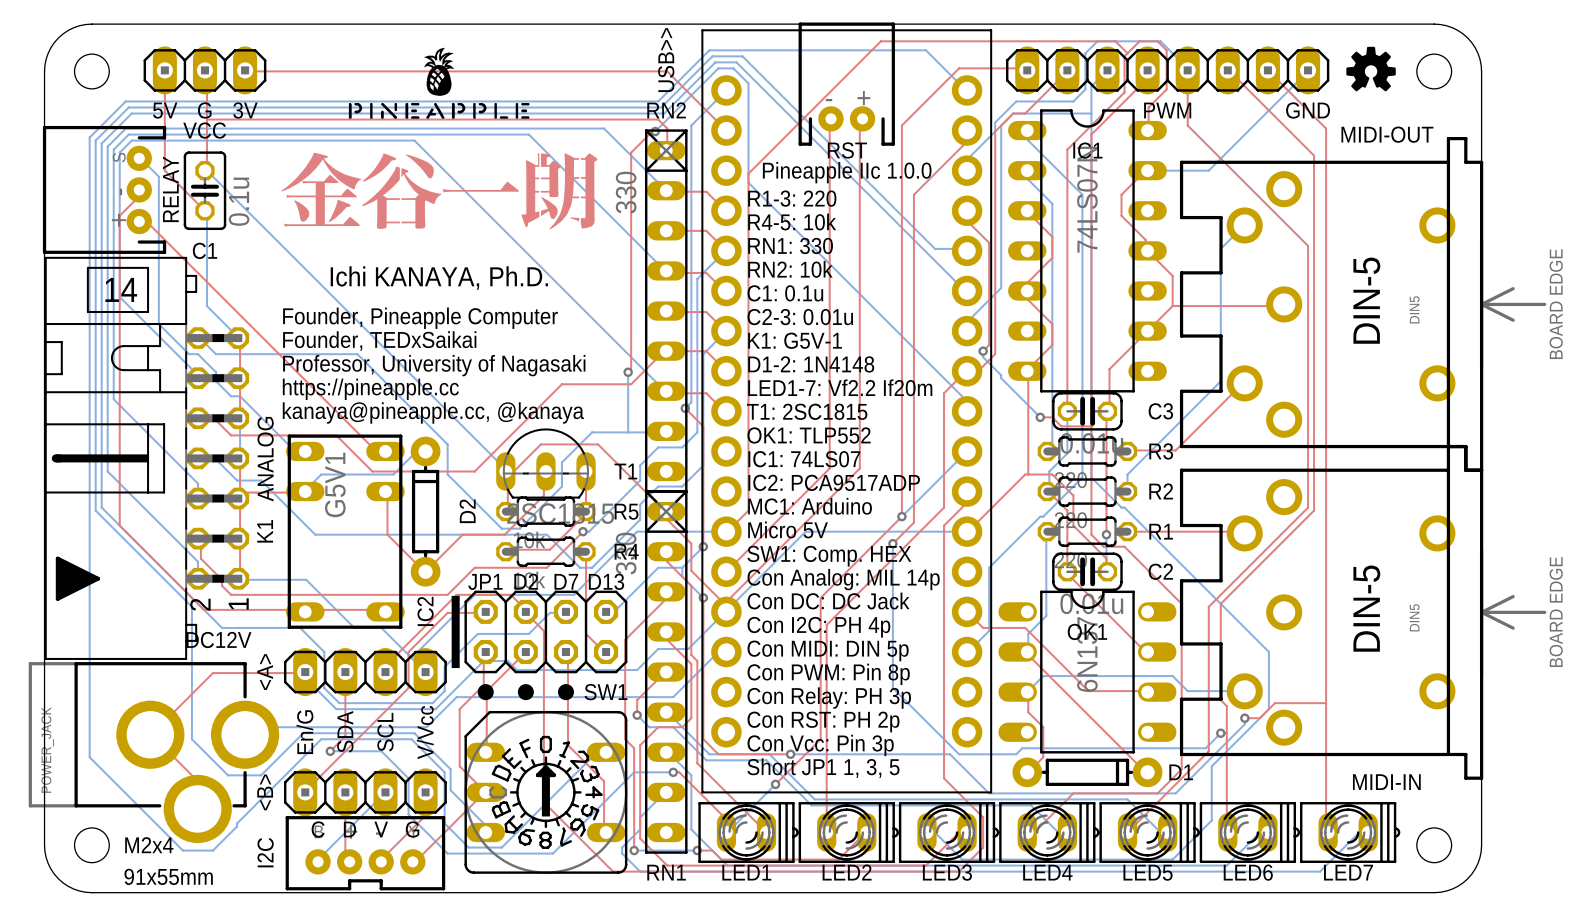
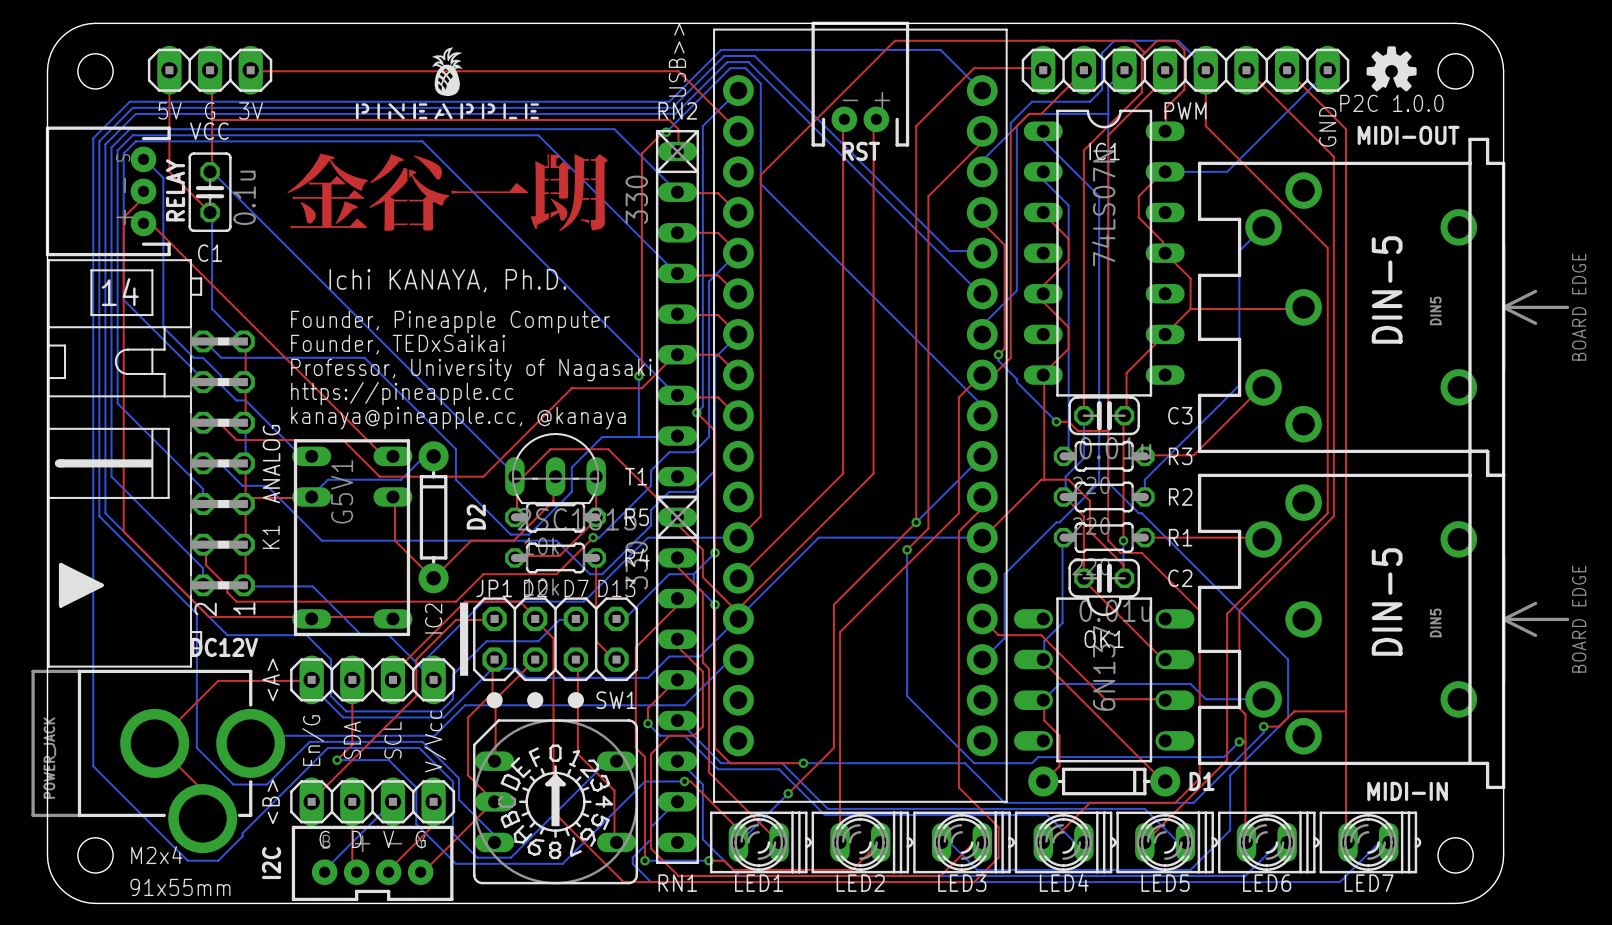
text: none -> P2C 1.0.0 (1391, 103)
text rotation: 0° (1308, 110) -> 90° counterclockwise (1327, 126)
text: Pineapple IIc 1.0.0 (847, 172) -> none
text: R1-3: 220 (792, 198) -> none
text: R4-5: 10k (792, 222) -> none
text: RN1: 330 (790, 245) -> none
text: RN2: 10k (790, 269) -> none
text: C1: 0.1u (785, 293) -> none
text: C2-3: 0.01u (800, 317) -> none
text: K1: G5V-1 (795, 340) -> none
text: D1-2: 1N4148 (811, 364) -> none
text: LED1-7: Vf2.2 If20m (840, 387) -> none
text: T1: 2SC1815 (807, 411) -> none
text: OK1: TLP552 (809, 435) -> none
text: IC1: 74LS07 (804, 459) -> none
text: IC2: PCA9517ADP (834, 482) -> none
text: MC1: Arduino (810, 506) -> none
text: Micro 5V (788, 529) -> none
text: SW1: Comp. HEX (829, 556) -> none
text: Con Analog: MIL 14p (843, 579) -> none
text: Con DC: DC Jack (828, 601) -> none
text: Con I2C: PH 4p (818, 627) -> none
text: Con MIDI: DIN 5p (828, 650) -> none
text: Con PWM: Pin 8p (828, 674) -> none
text: Con Relay: PH 3p (829, 698) -> none
text: Con RST: PH 2p (823, 722) -> none
text: Con Vcc: Pin 3p (820, 745) -> none
text: Short JP1 1, 3, 5 (823, 768) -> none

